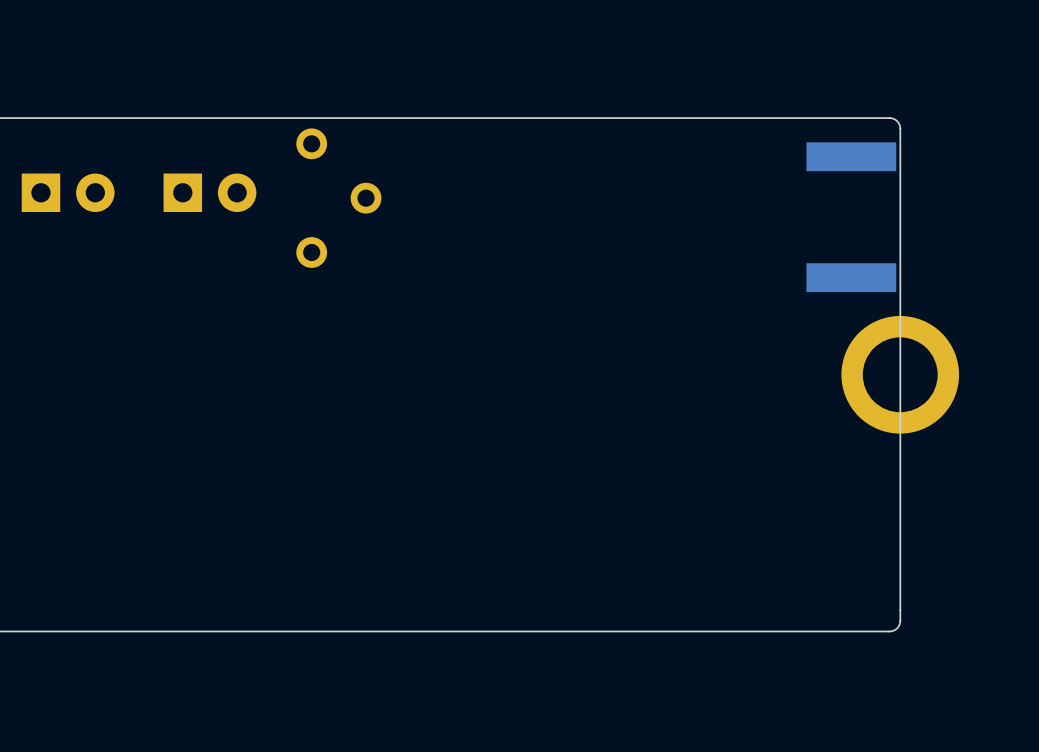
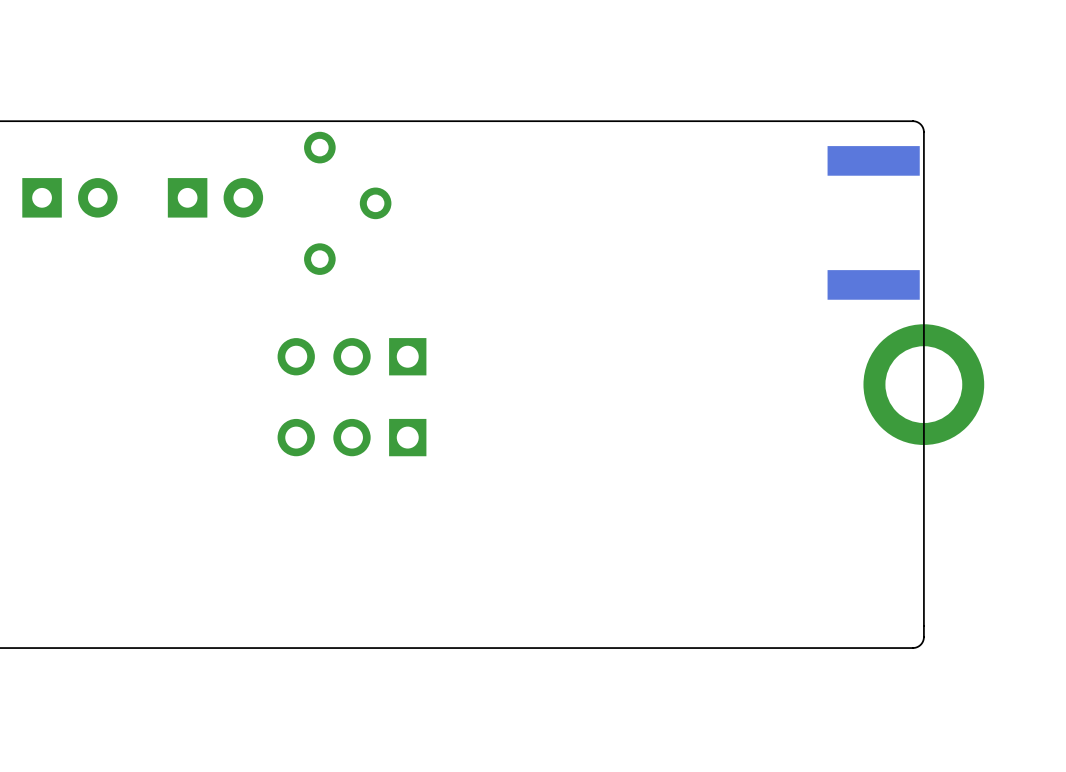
part: none -> (351, 356)
part: none -> (351, 437)

